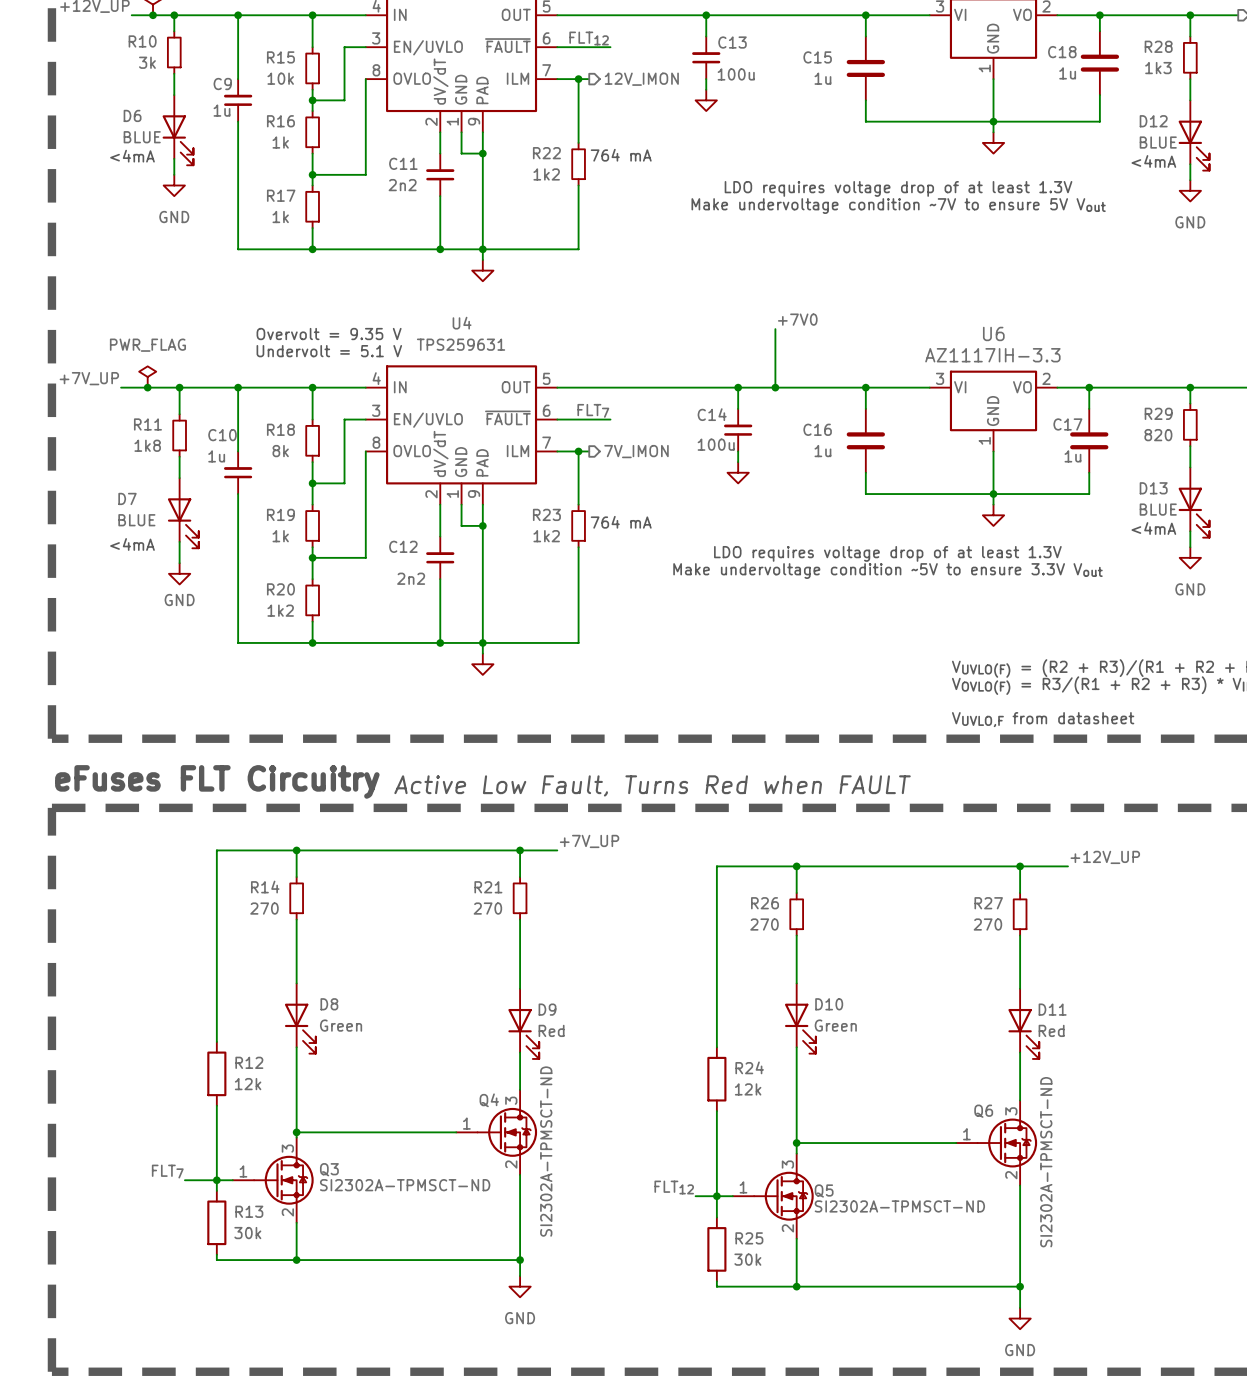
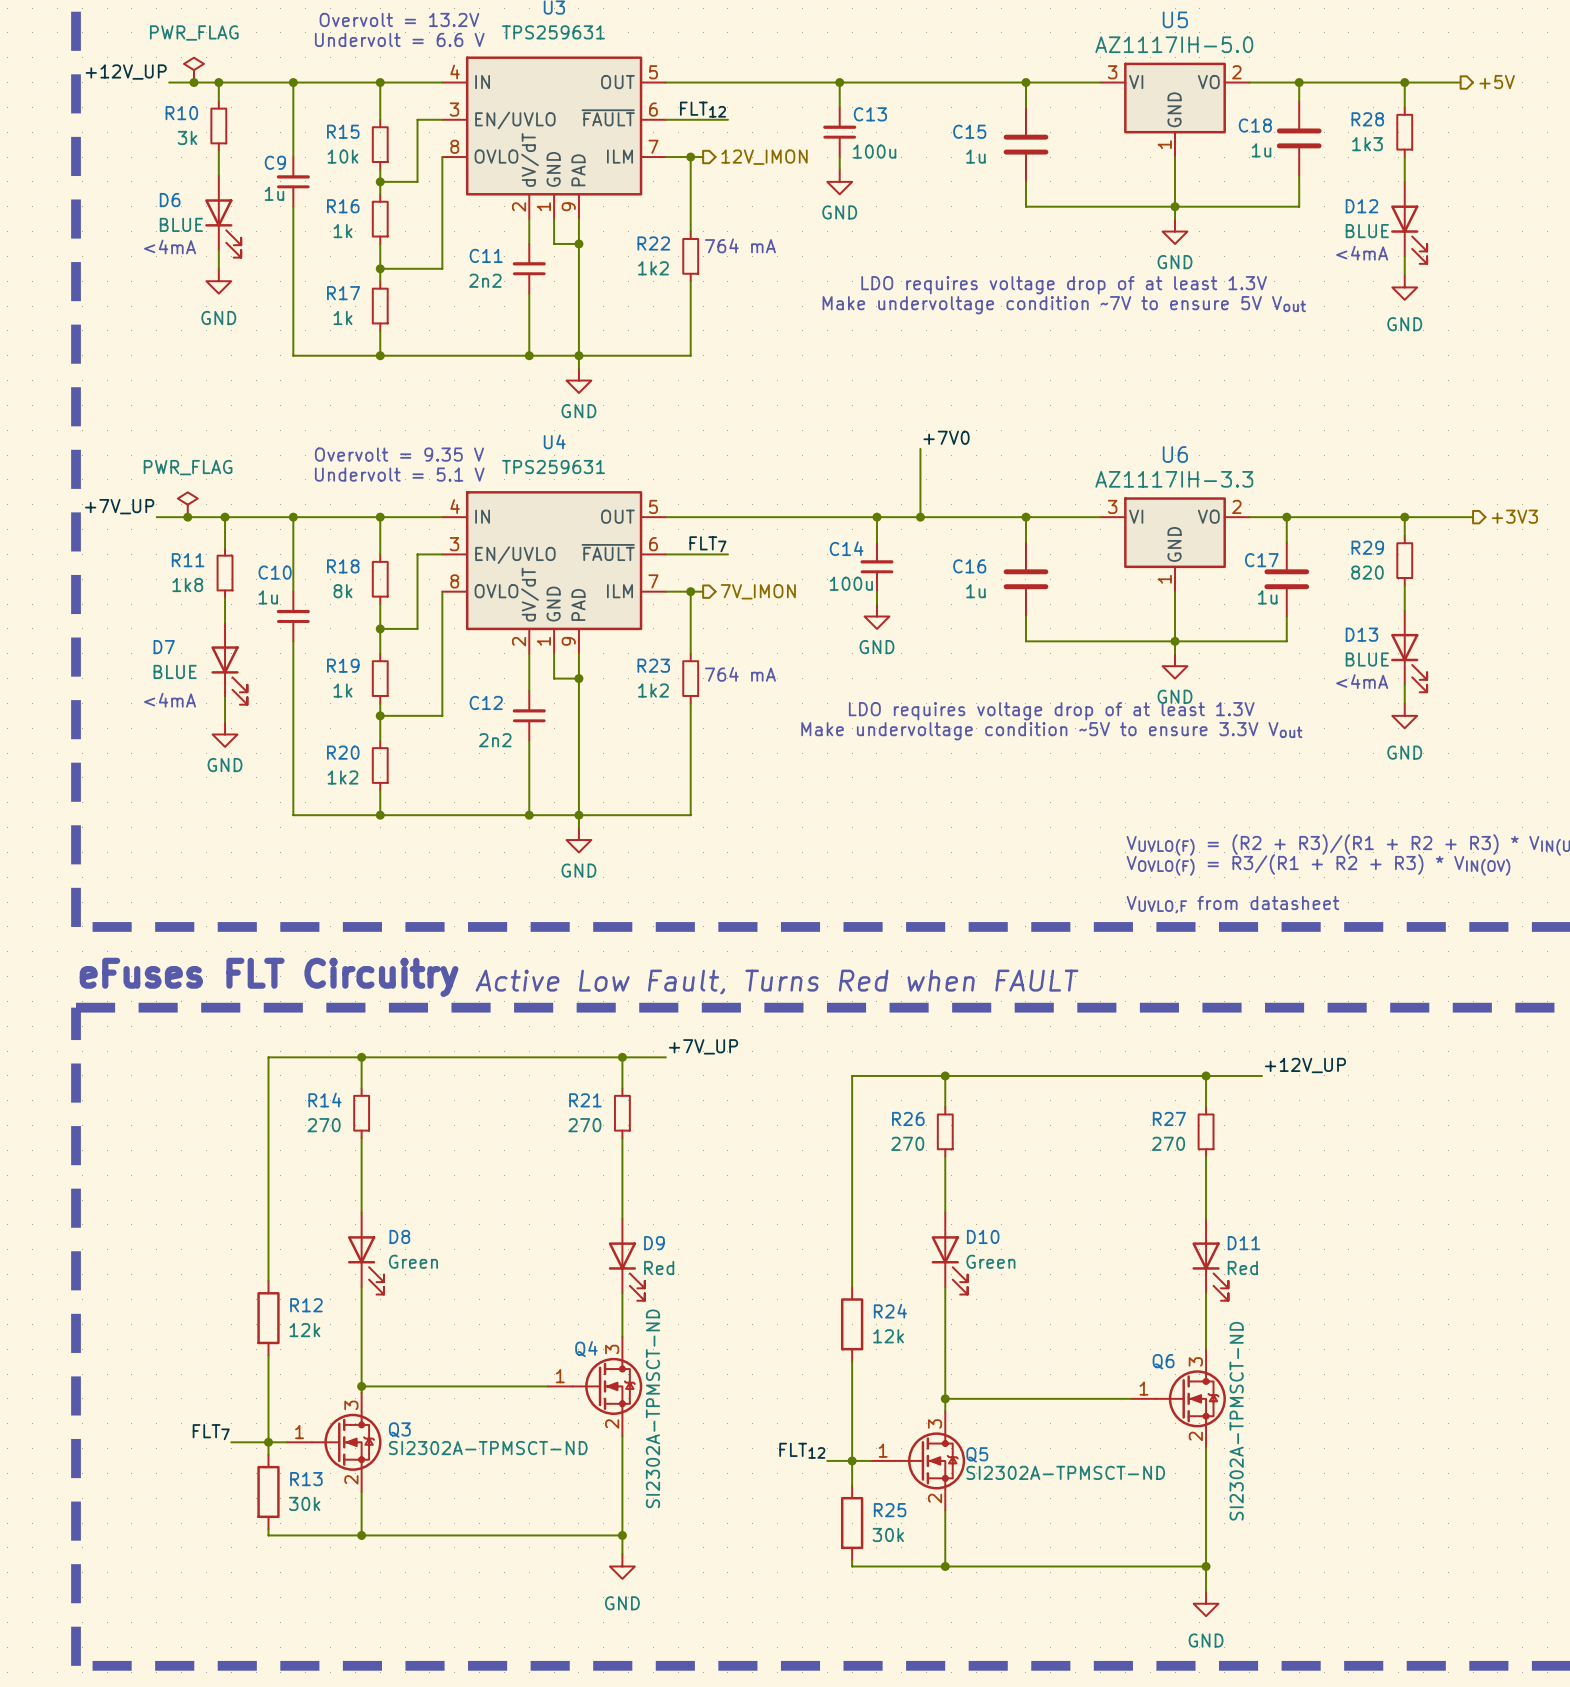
power symbol text: none -> GND (839, 212)
power symbol text: none -> GND (1175, 262)
power symbol text: none -> GND (578, 411)
power symbol text: none -> GND (876, 647)
power symbol text: none -> GND (1175, 696)
power symbol text: none -> GND (578, 870)

